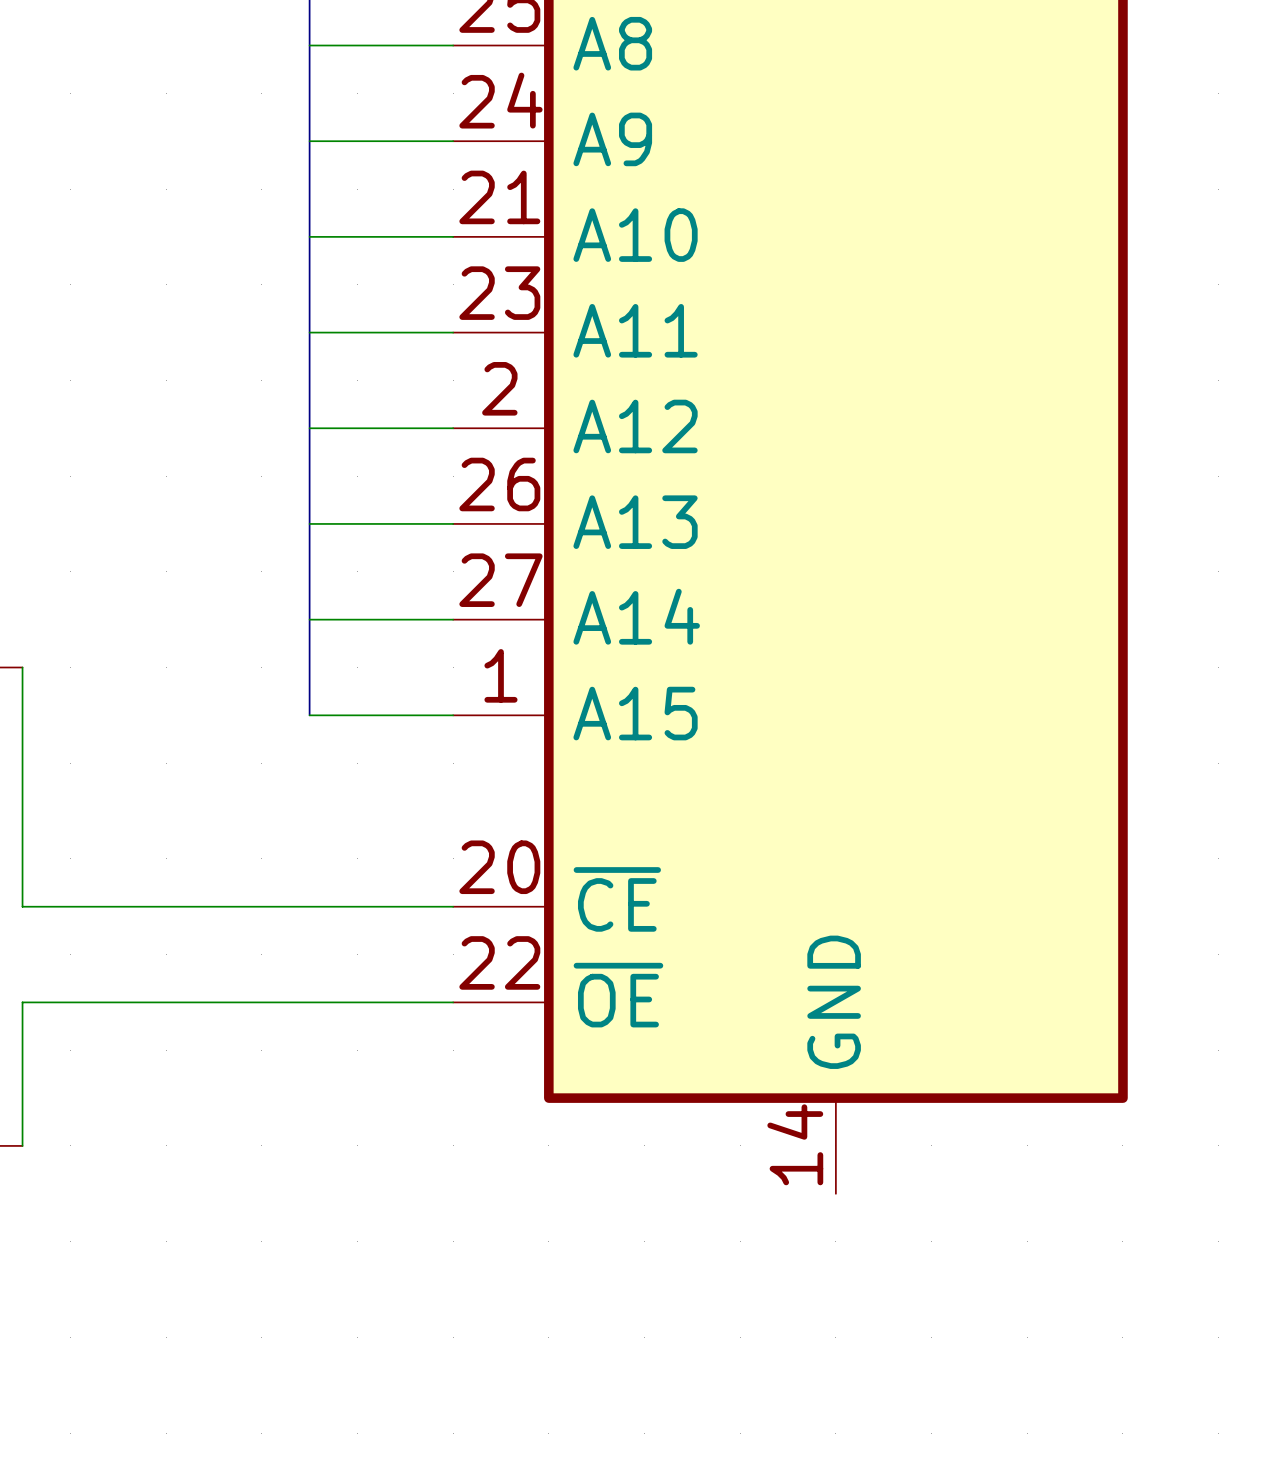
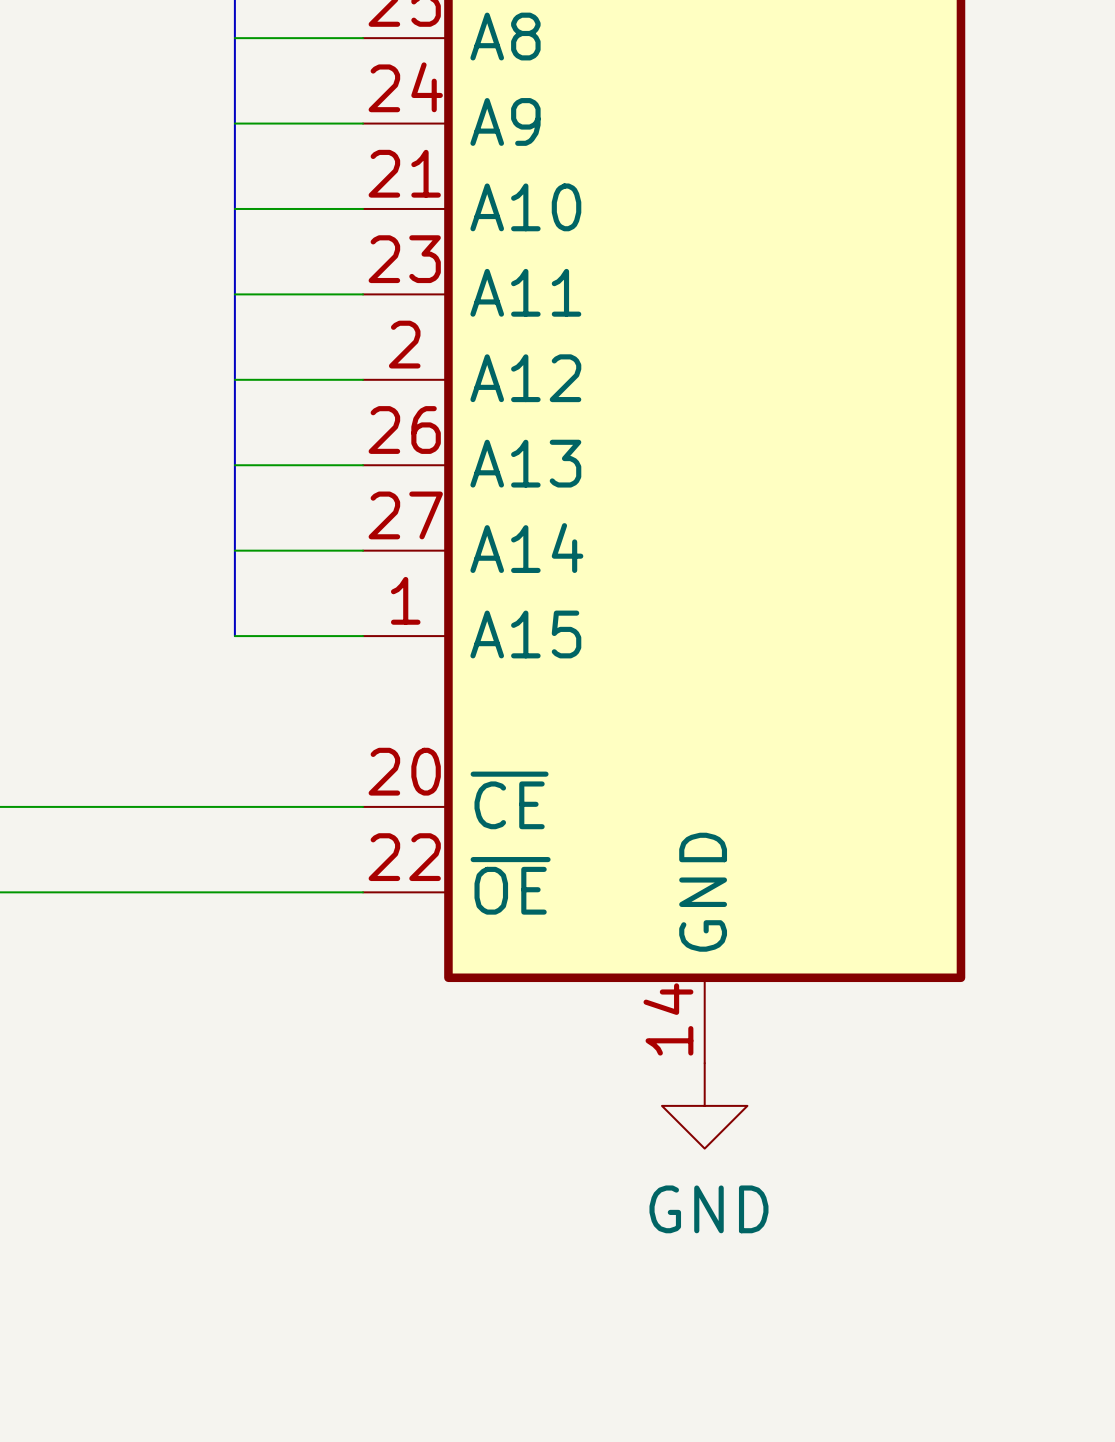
power symbol: none -> GND (704, 1105)

